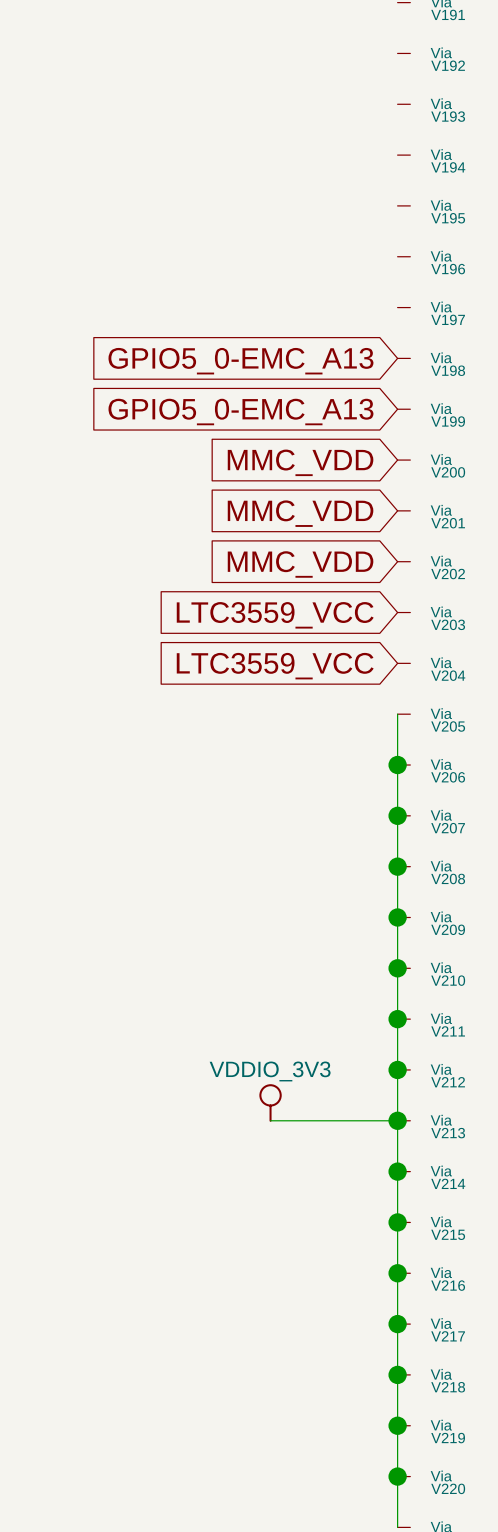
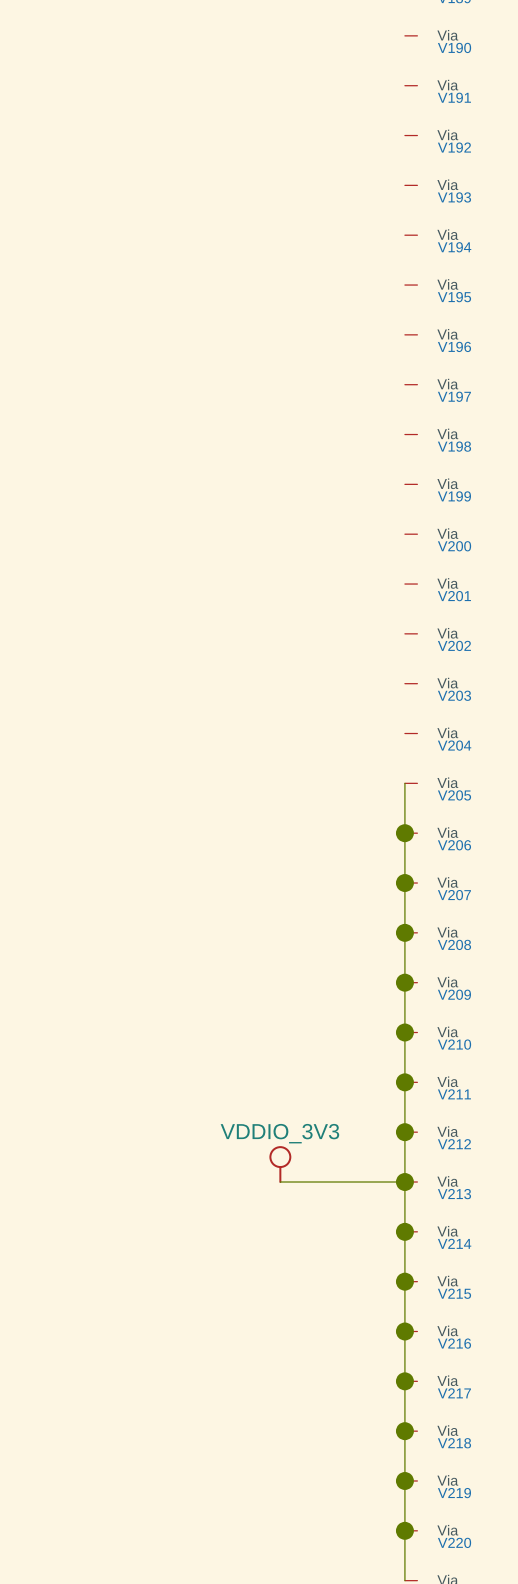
global label: GPIO5_0-EMC_A13 (240, 361) -> none
global label: GPIO5_0-EMC_A13 (240, 412) -> none
global label: MMC_VDD (300, 462) -> none
global label: MMC_VDD (300, 513) -> none
global label: MMC_VDD (300, 564) -> none
global label: LTC3559_VCC (275, 615) -> none
global label: LTC3559_VCC (275, 666) -> none

